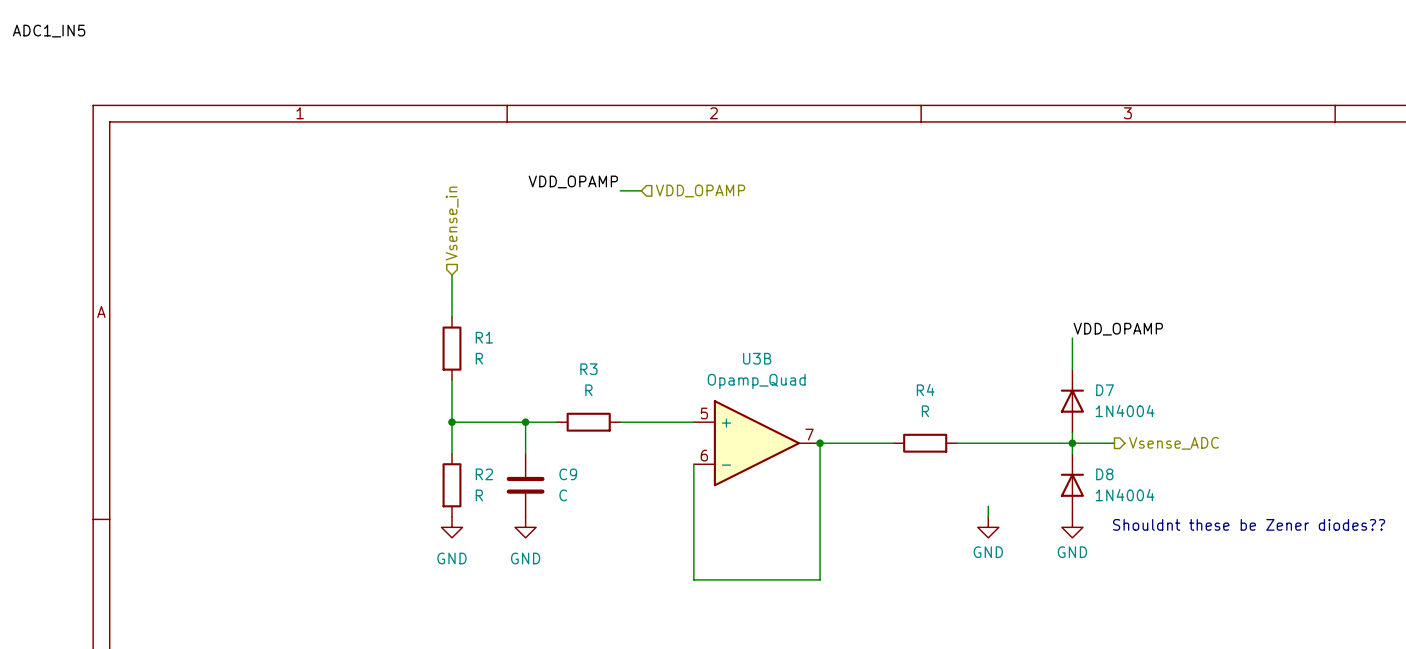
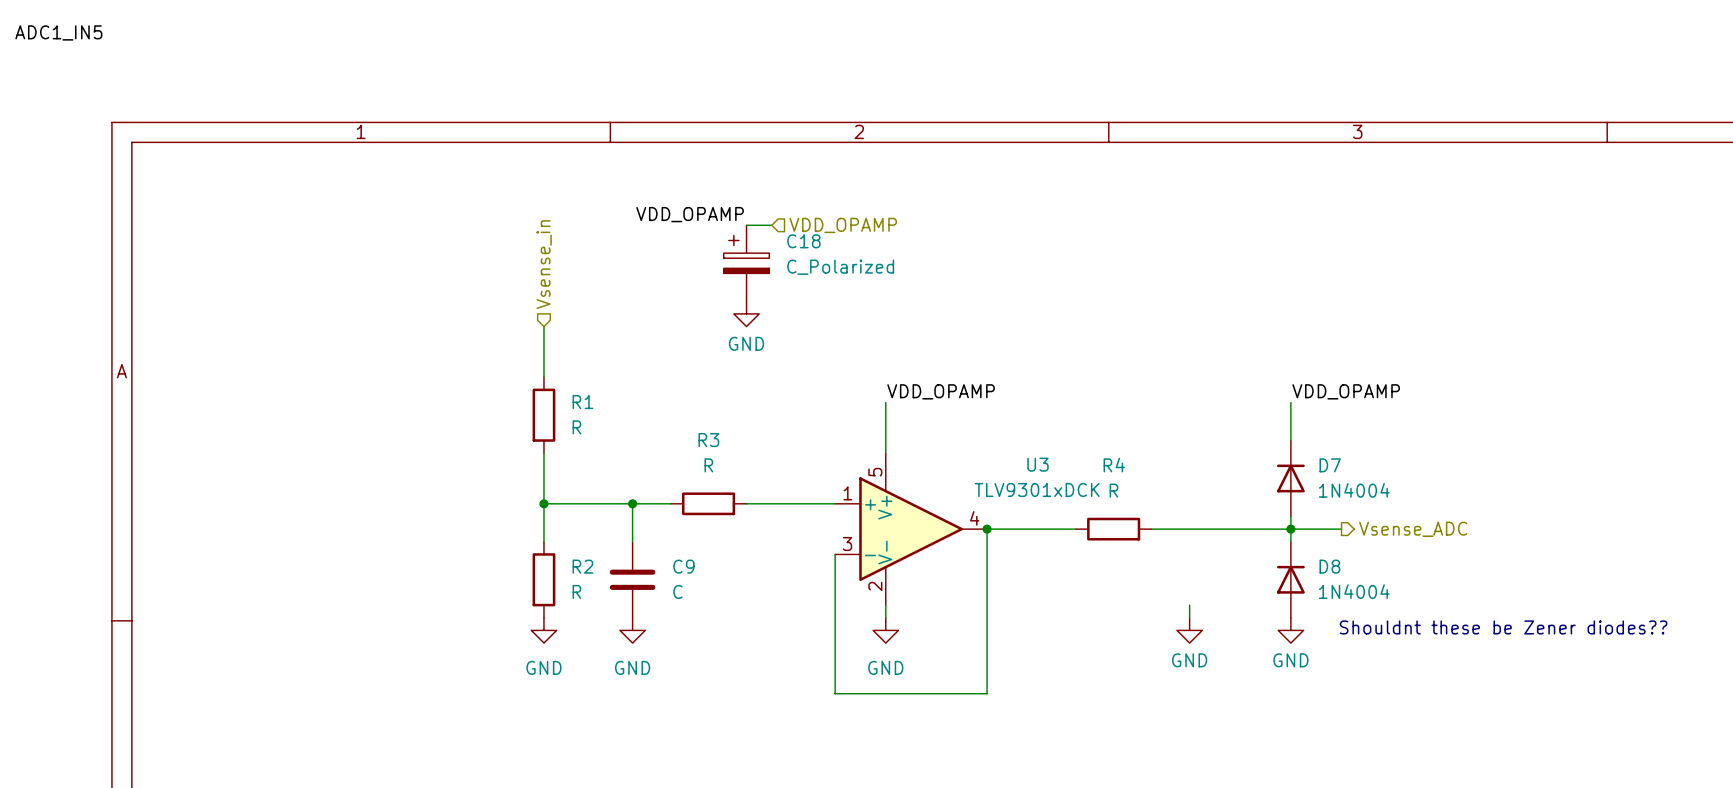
C18: none -> C_Polarized (746, 263)
power symbol: none -> GND (746, 313)
label: none -> VDD_OPAMP (941, 391)
wire: none -> (885, 402) (885, 453)
U3B: Opamp_Quad (756, 443) -> none
U3: none -> TLV9301xDCK (911, 529)
wire: none -> (885, 605) (885, 617)
power symbol: none -> GND (885, 630)

